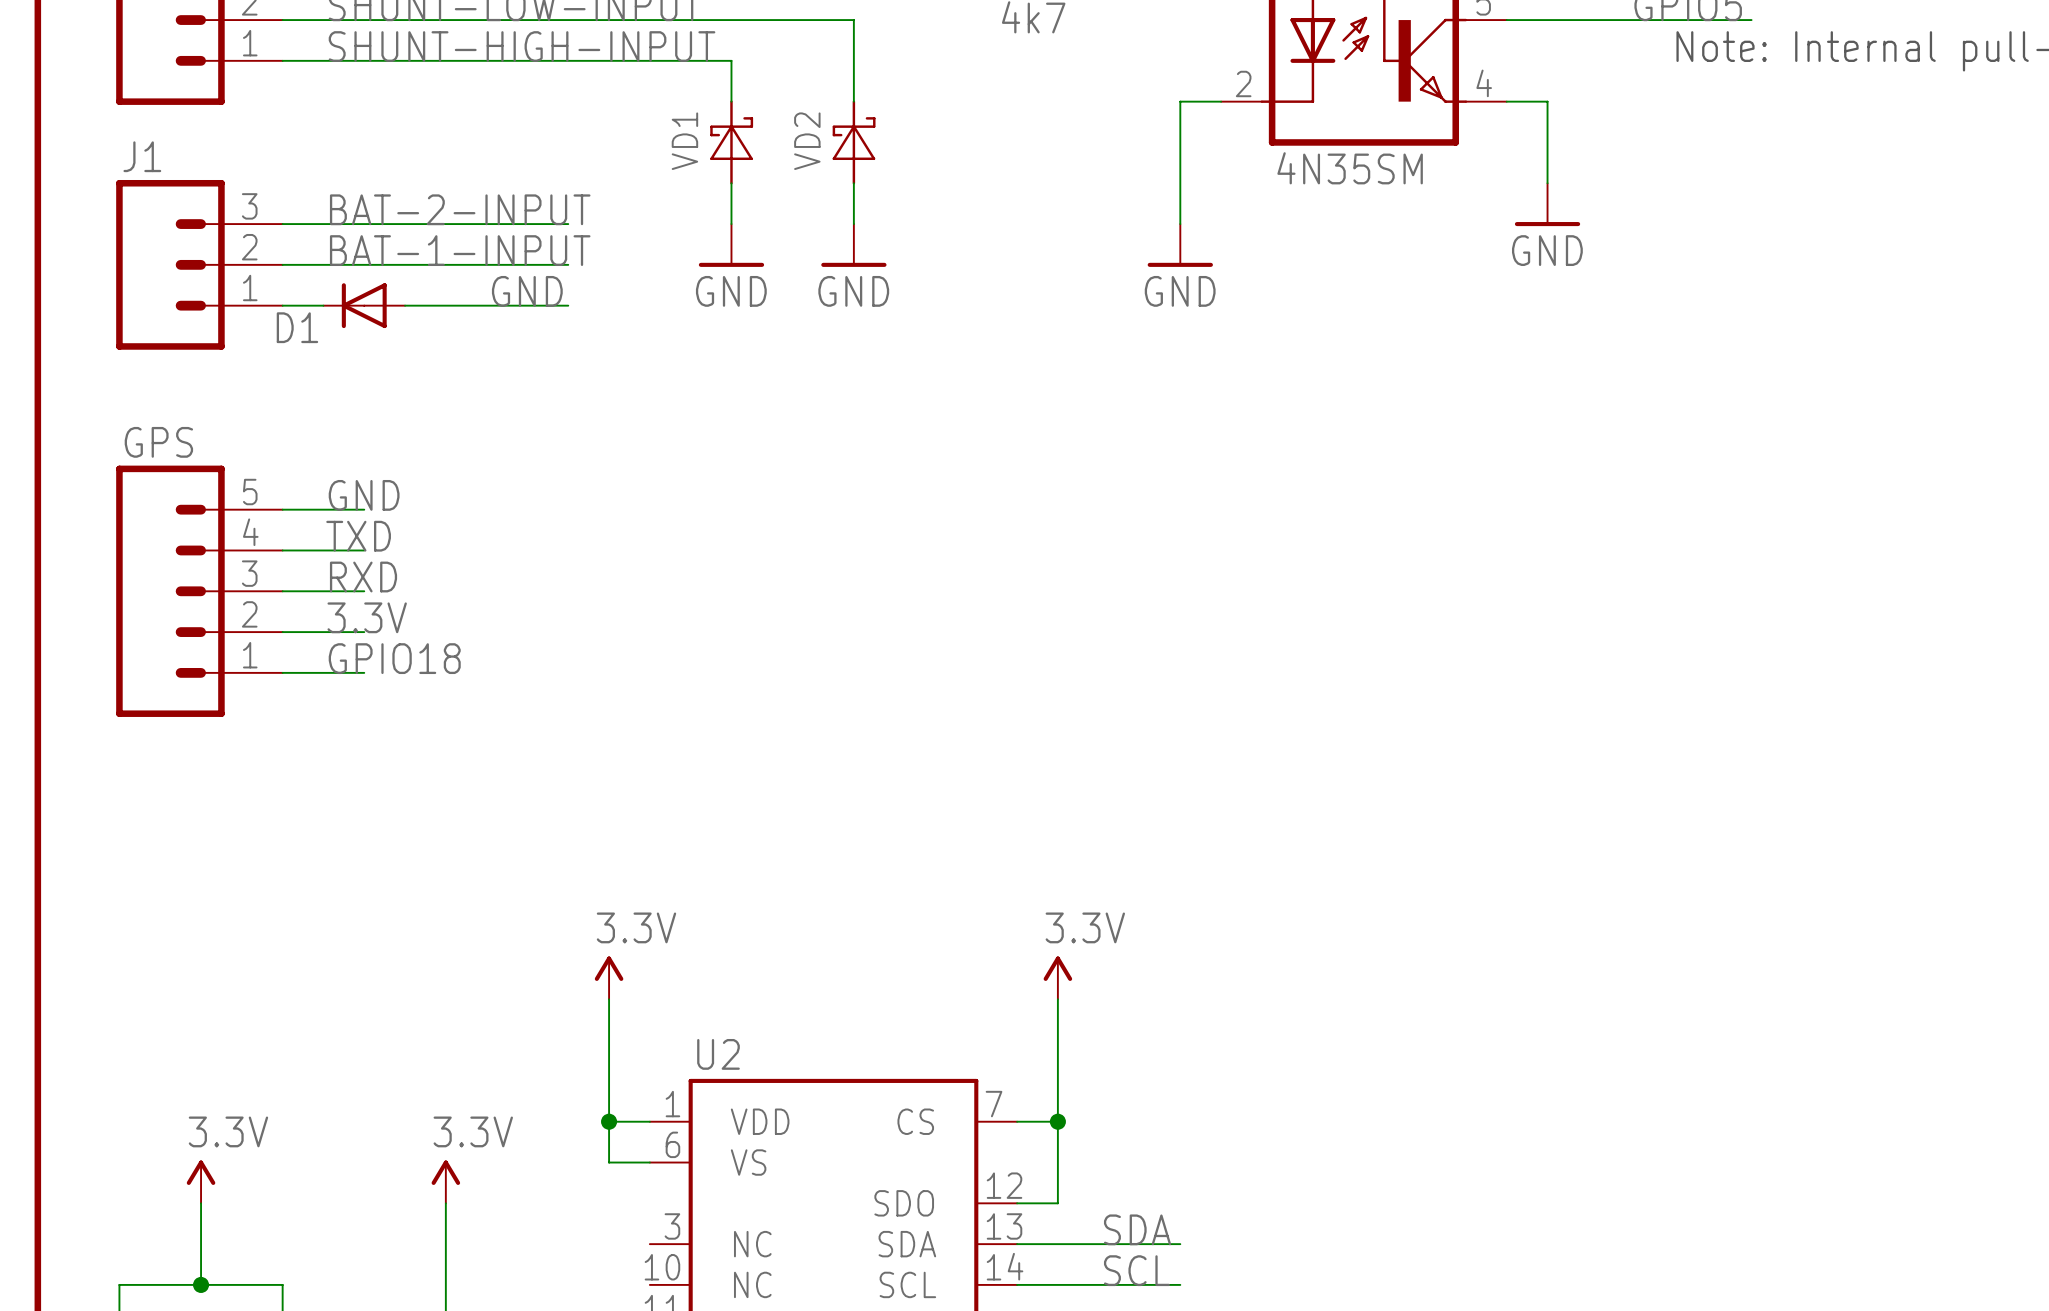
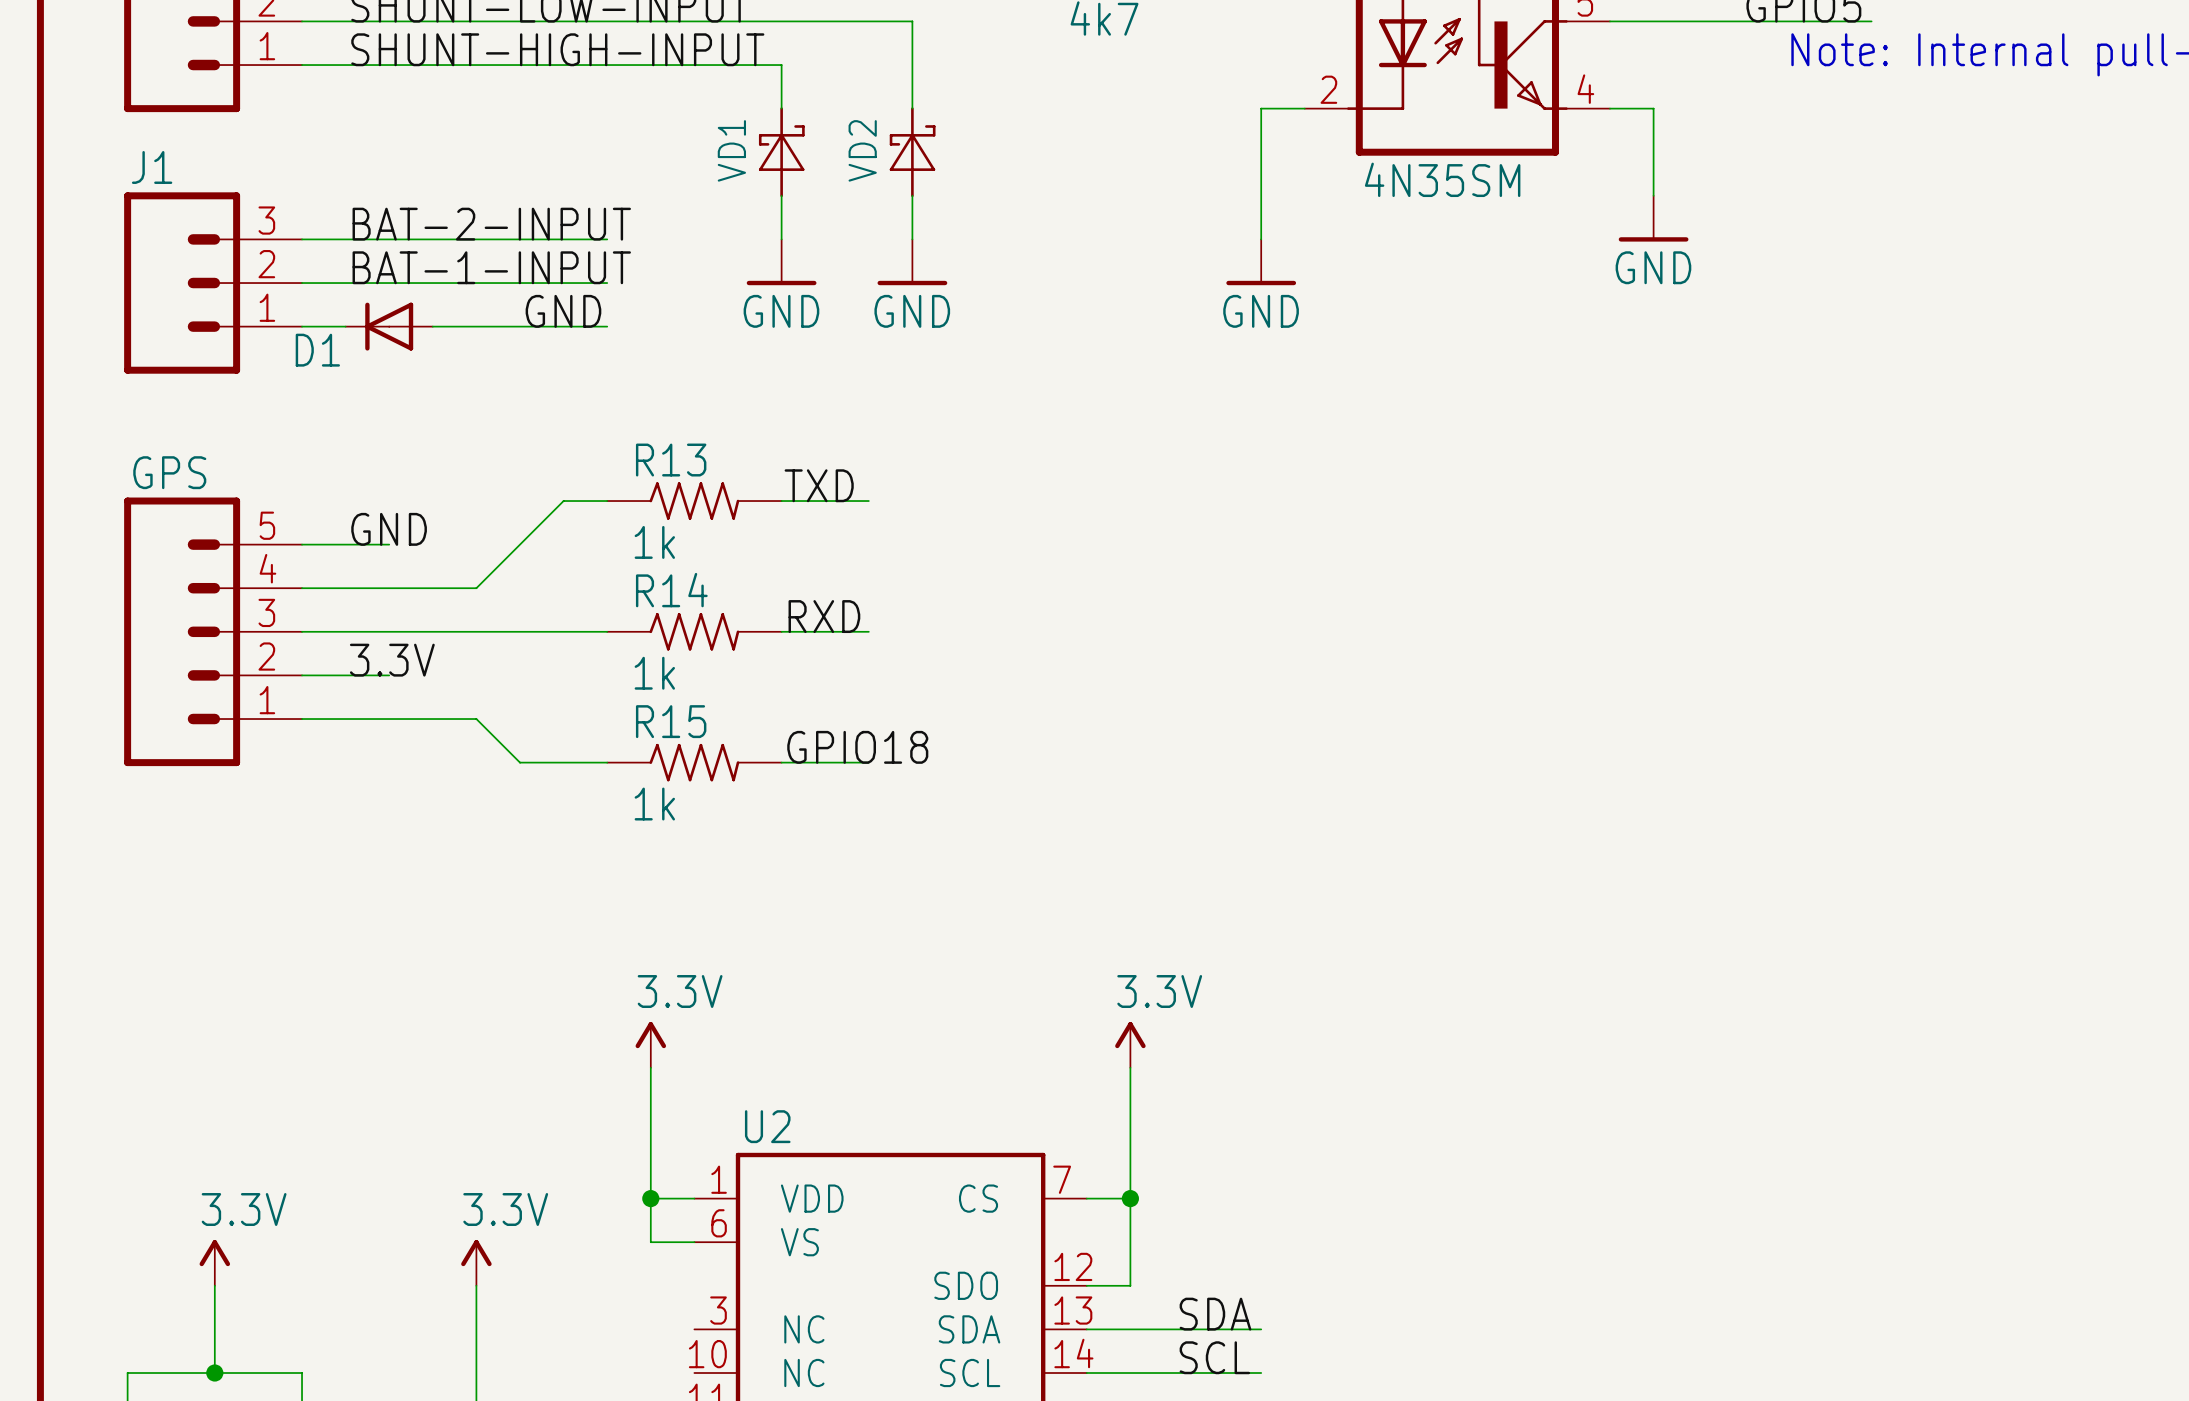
label: none -> TXD (819, 485)
wire: none -> (607, 501) (563, 501) (476, 588) (389, 588)
R13: none -> 1k (694, 501)
wire: none -> (781, 501) (868, 501)
label: TXD (358, 536) -> none
label: RXD (363, 577) -> none
label: none -> RXD (824, 616)
wire: none -> (389, 631) (607, 631)
R14: none -> 1k (694, 631)
wire: none -> (781, 631) (868, 631)
label: GPIO18 (394, 658) -> none
wire: none -> (389, 719) (476, 719) (520, 762) (607, 762)
label: none -> GPIO18 (857, 747)
R15: none -> 1k (694, 762)
wire: none -> (781, 762) (868, 762)

